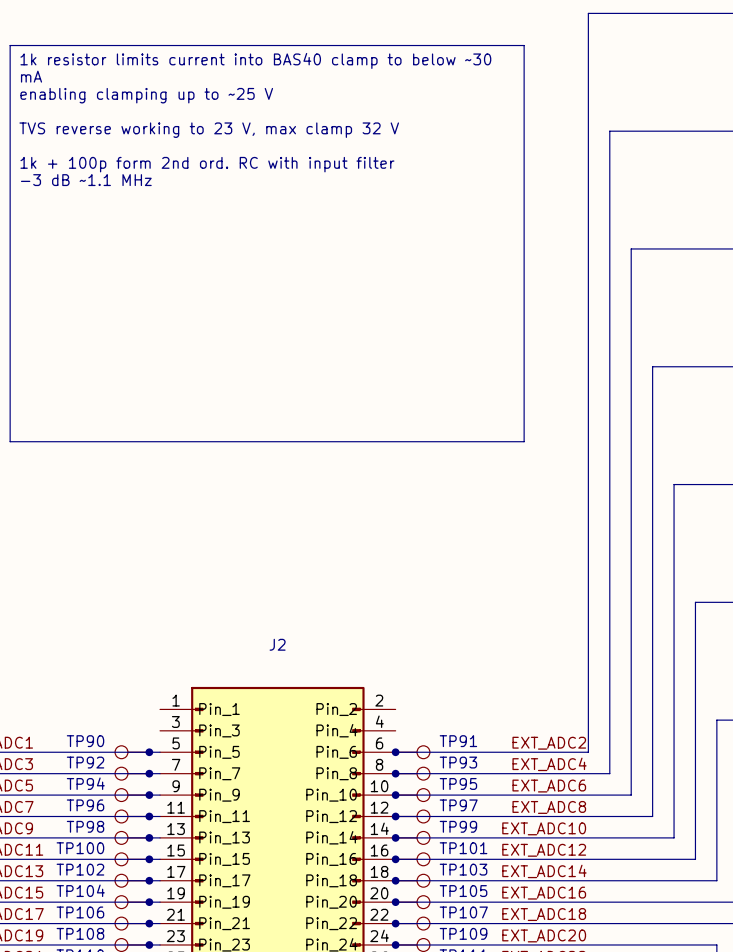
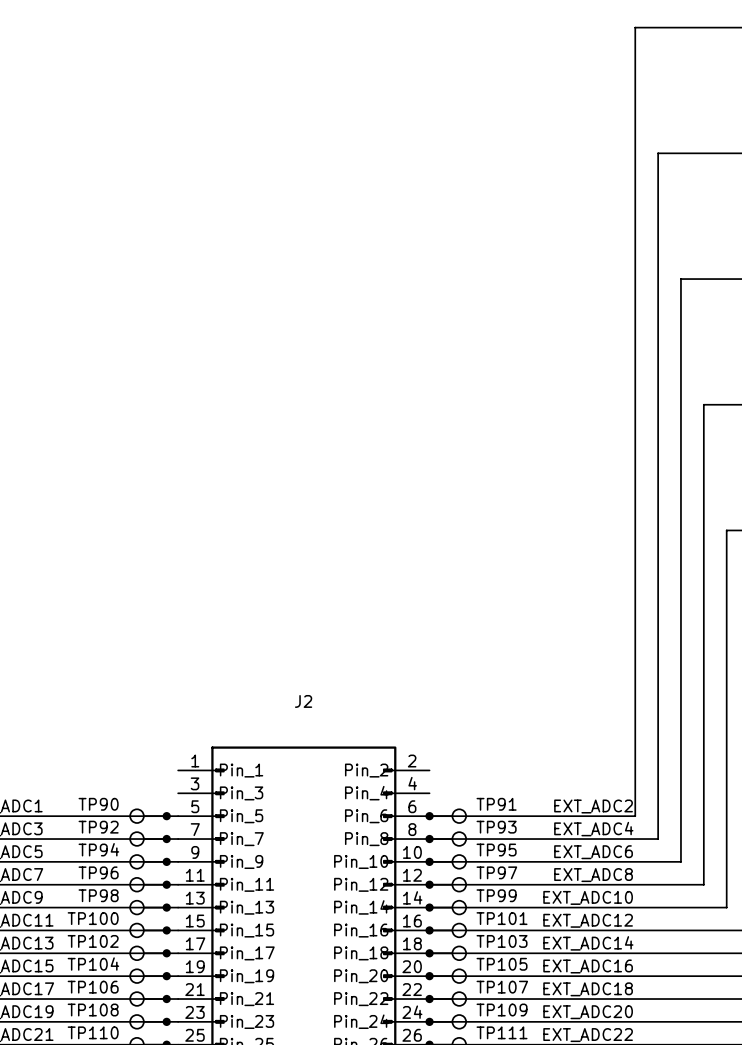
line: (10, 45) (524, 45) (524, 441) (10, 441) (10, 45) -> none
text: 1k resistor limits current into BAS40 clamp to below ~30 (255, 60) -> none
text: mA (31, 76) -> none
text: enabling clamping up to ~25 V (146, 95) -> none
text: TVS reverse working to 23 V, max clamp 32 V (209, 130) -> none
text: 1k + 100p form 2nd ord. RC with input filter (207, 164) -> none
text: -3 dB ~1.1 MHz (86, 180) -> none

